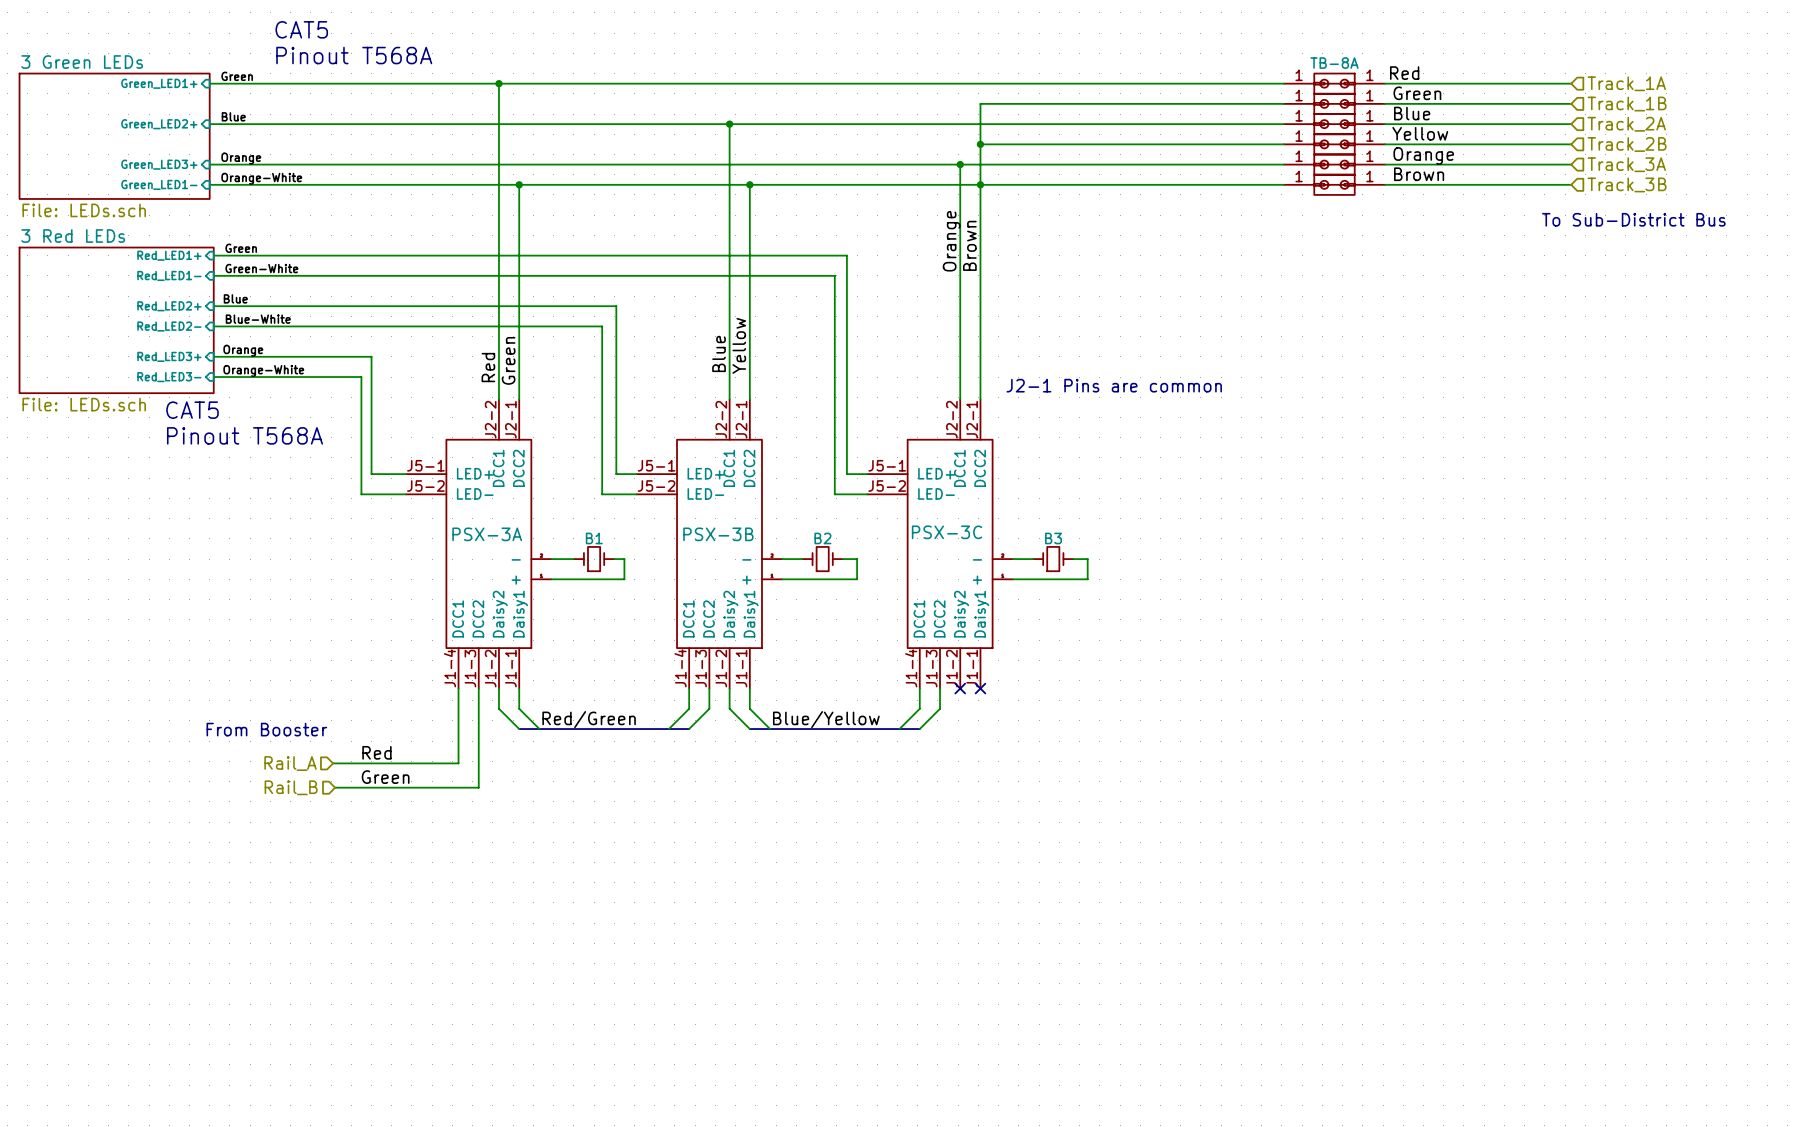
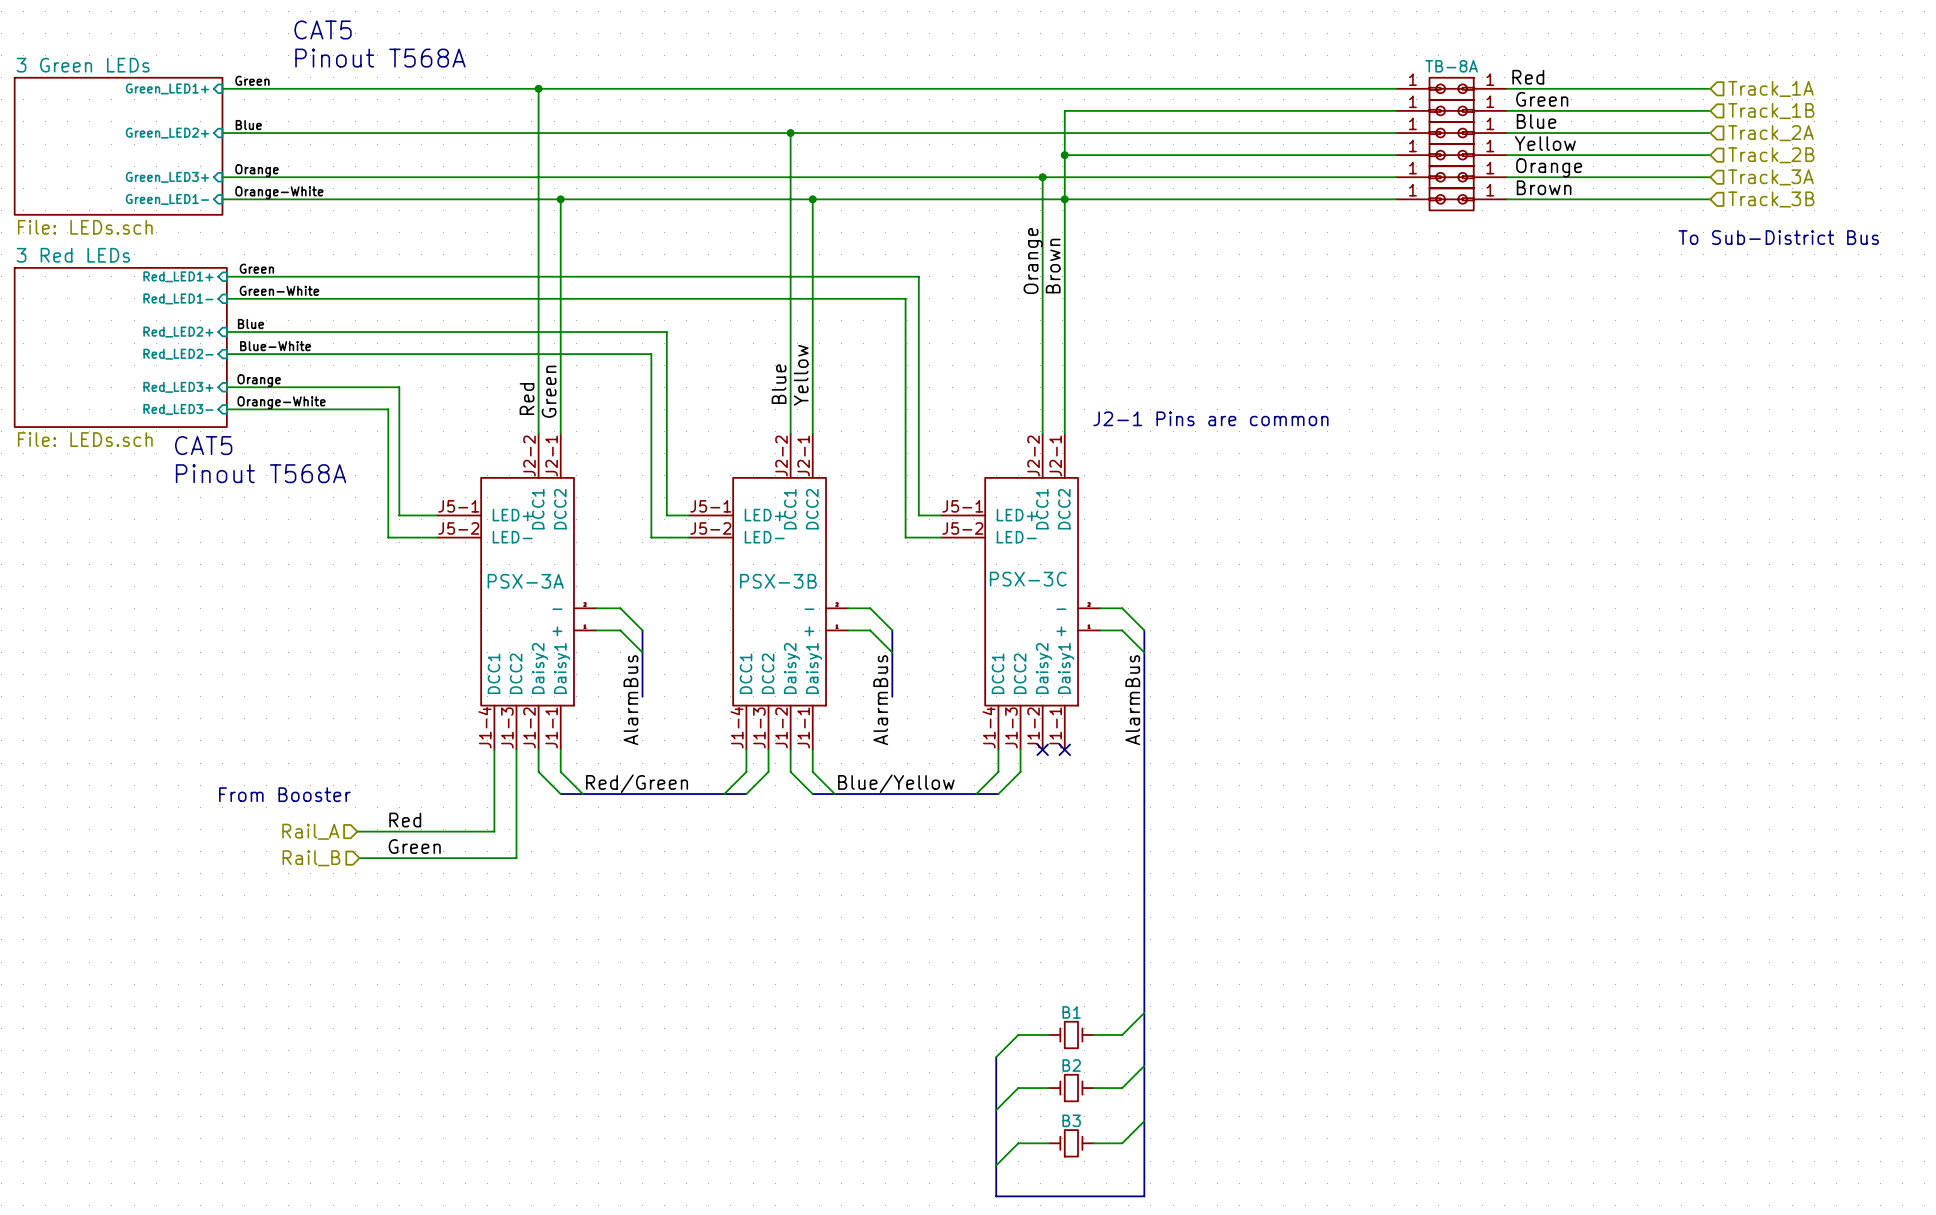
wire: none -> (620, 608) (642, 630)
B1 position: (594, 559) -> (1071, 1034)
wire: (614, 559) (624, 559) (624, 579) (573, 579) -> (642, 652) (620, 630)
wire: none -> (870, 608) (892, 630)
B2 position: (822, 559) -> (1071, 1088)
wire: (842, 559) (857, 559) (857, 579) (802, 579) -> (892, 652) (870, 630)
wire: none -> (1122, 608) (1144, 630)
B3 position: (1053, 559) -> (1071, 1143)
wire: (1073, 559) (1087, 559) (1087, 579) (1033, 579) -> (1144, 652) (1122, 630)
bus: none -> (642, 630) (642, 696)
bus: none -> (892, 630) (892, 696)
bus: none -> (1144, 630) (1144, 1196) (996, 1196) (996, 1057)
label: none -> AlarmBus (630, 700)
label: none -> AlarmBus (880, 700)
label: none -> AlarmBus (1132, 700)
wire: none -> (1144, 1012) (1122, 1034) (1093, 1034)
wire: none -> (1049, 1034) (1018, 1034) (996, 1057)
wire: none -> (1144, 1065) (1122, 1088) (1093, 1088)
wire: none -> (1049, 1088) (1018, 1088) (996, 1110)
wire: none -> (1144, 1121) (1122, 1143) (1093, 1143)
wire: none -> (1049, 1143) (1018, 1143) (996, 1165)

